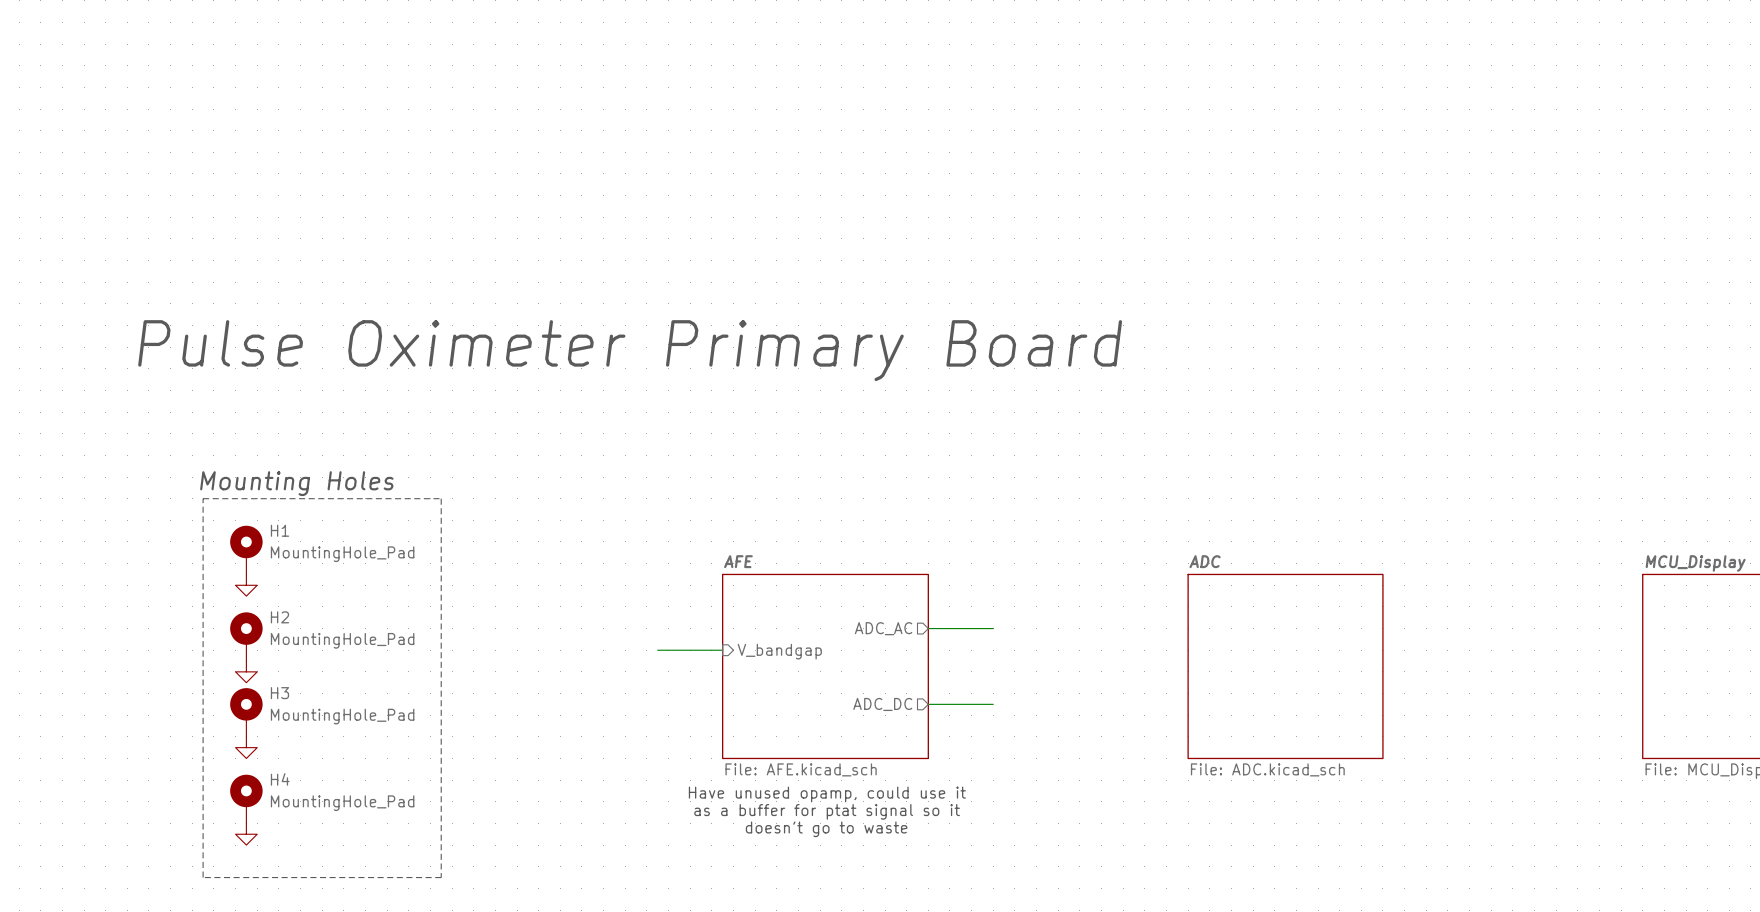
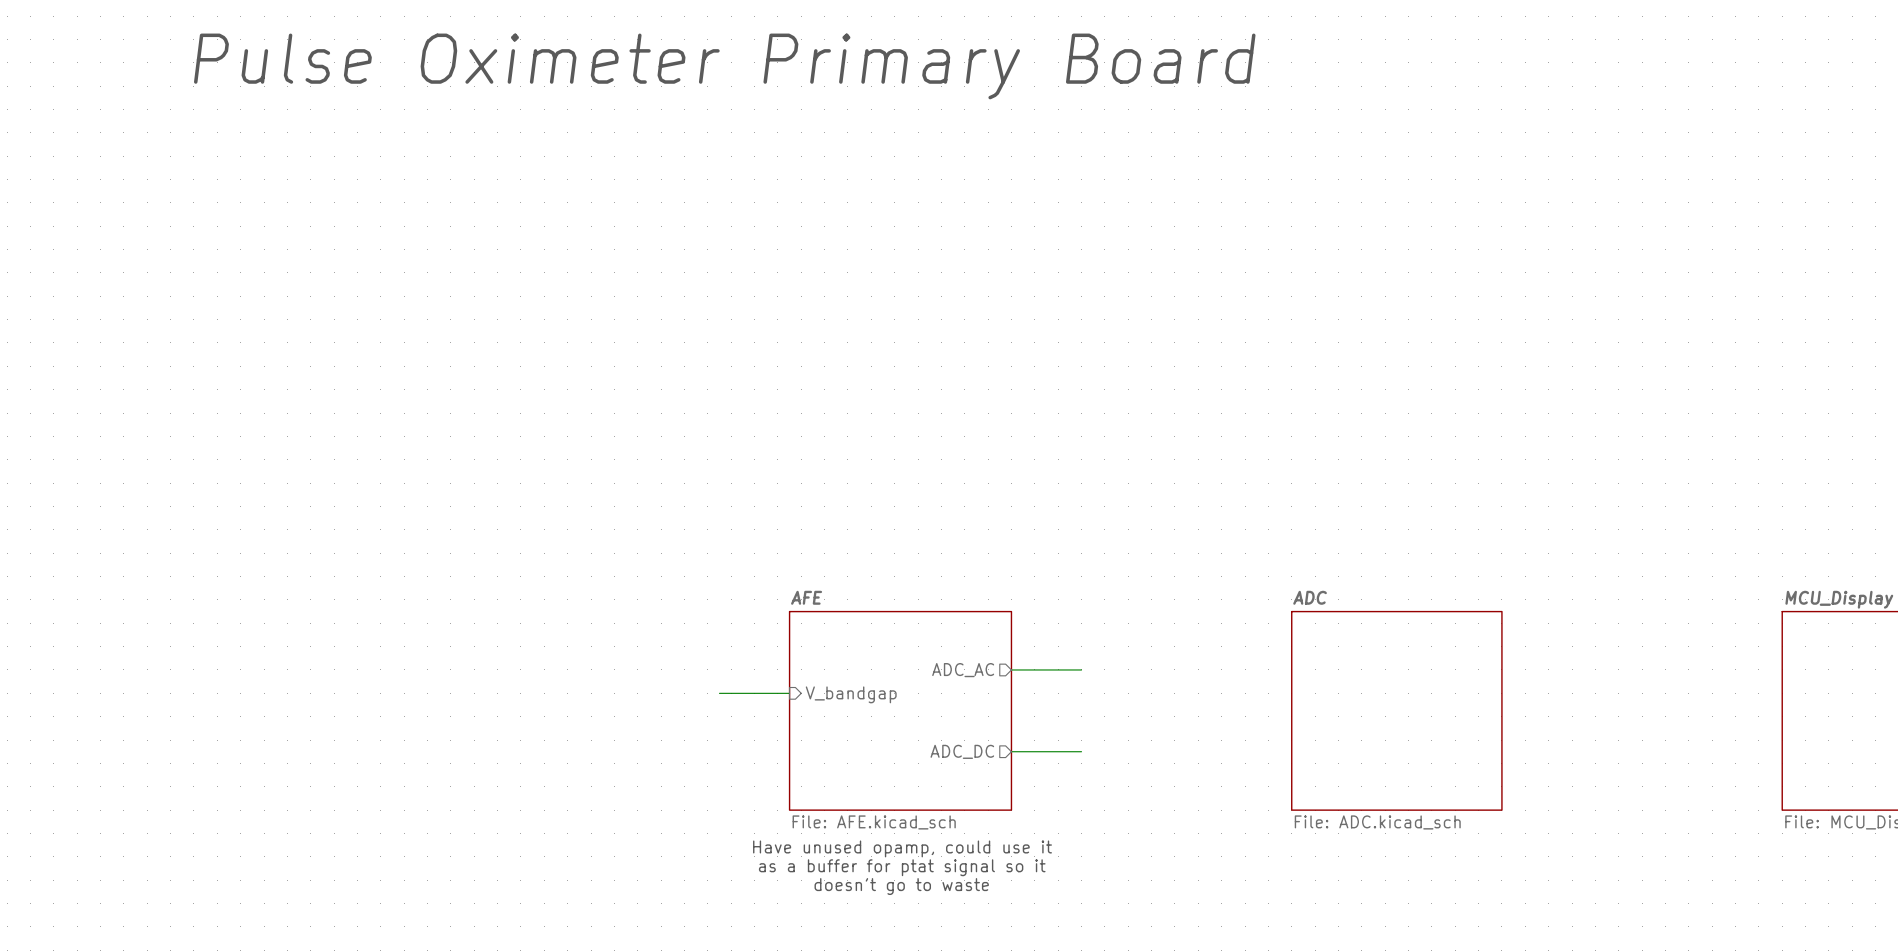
text: none -> Pulse Oximeter Primary Board (724, 66)
text: Pulse Oximeter Primary Board (630, 350) -> none
text: Mounting Holes (296, 483) -> none
line: (203, 498) (441, 498) (441, 877) (203, 877) (203, 498) -> none
H1: MountingHole_Pad (246, 550) -> none
power symbol: (246, 585) -> none
H2: MountingHole_Pad (246, 636) -> none
power symbol: (246, 671) -> none
H3: MountingHole_Pad (246, 712) -> none
power symbol: (246, 747) -> none
H4: MountingHole_Pad (246, 799) -> none
power symbol: (246, 834) -> none

